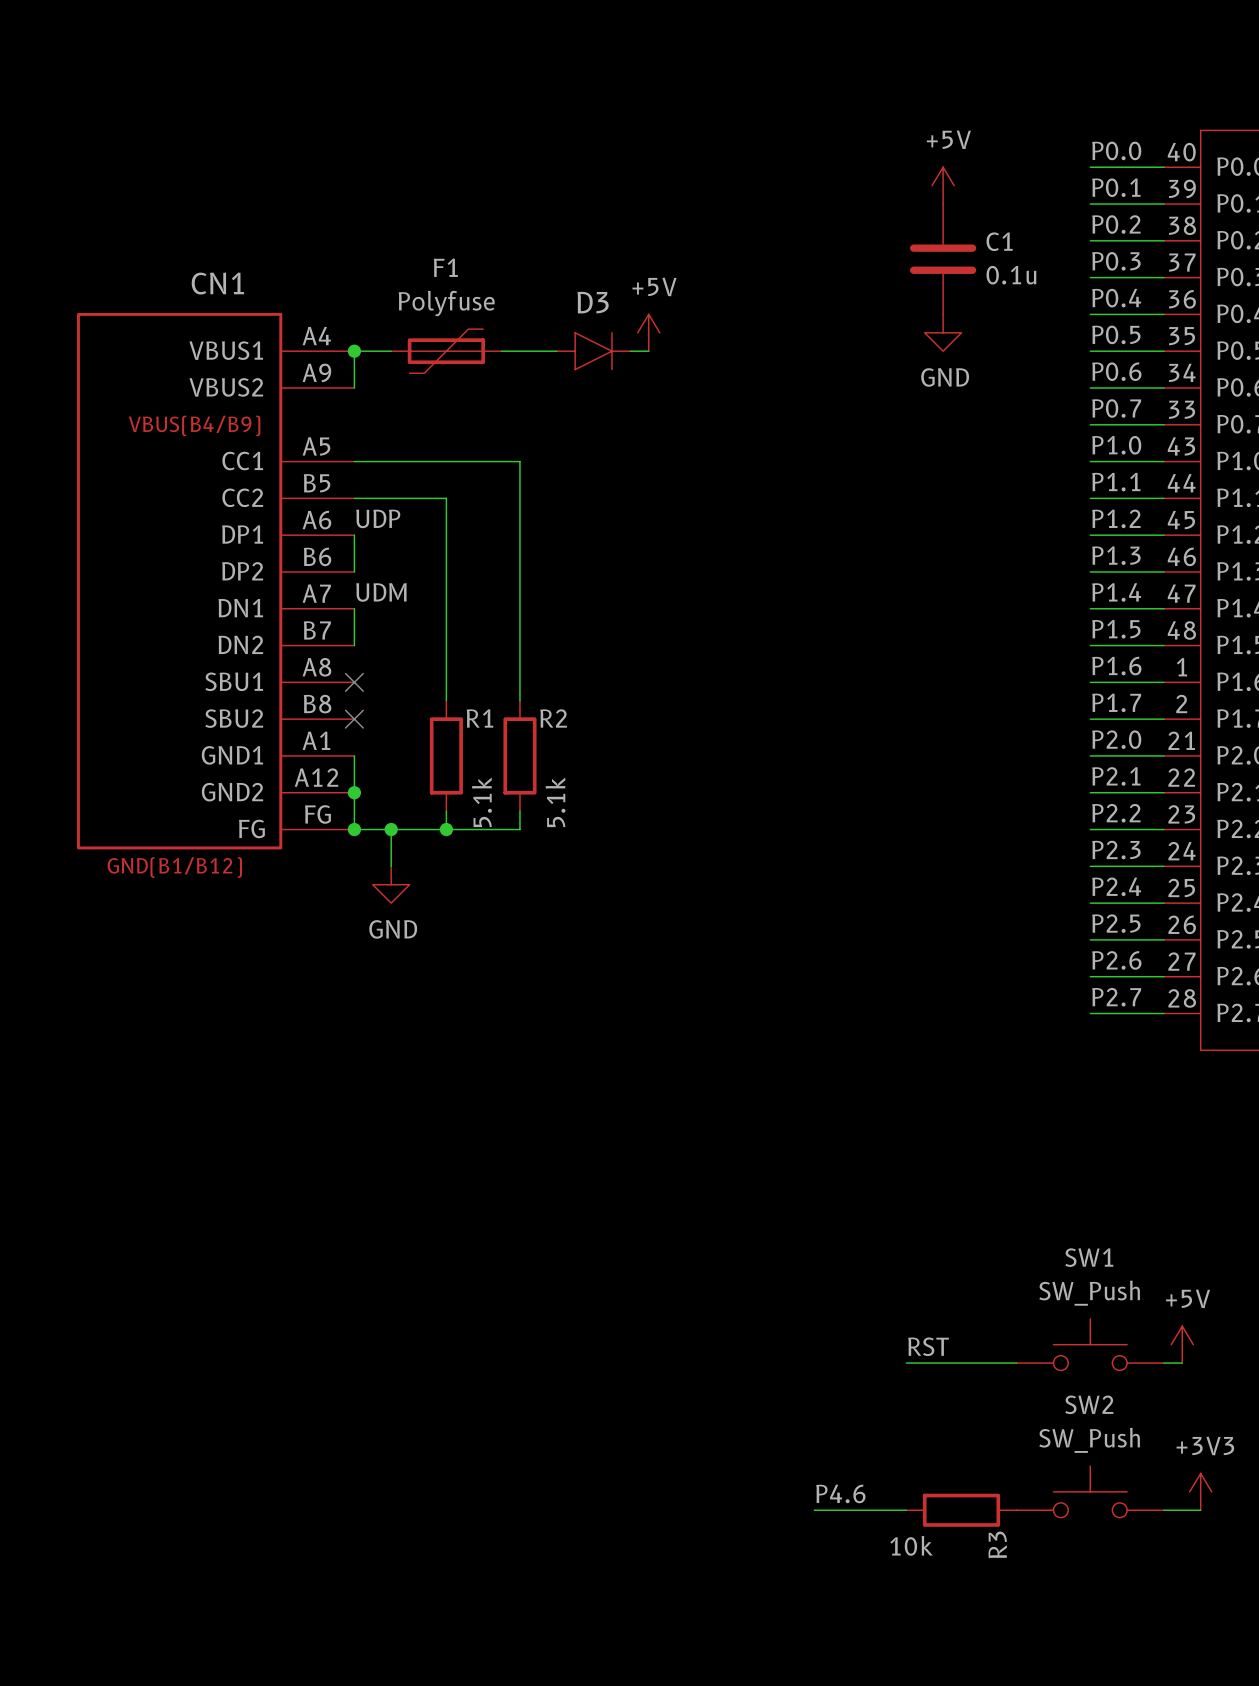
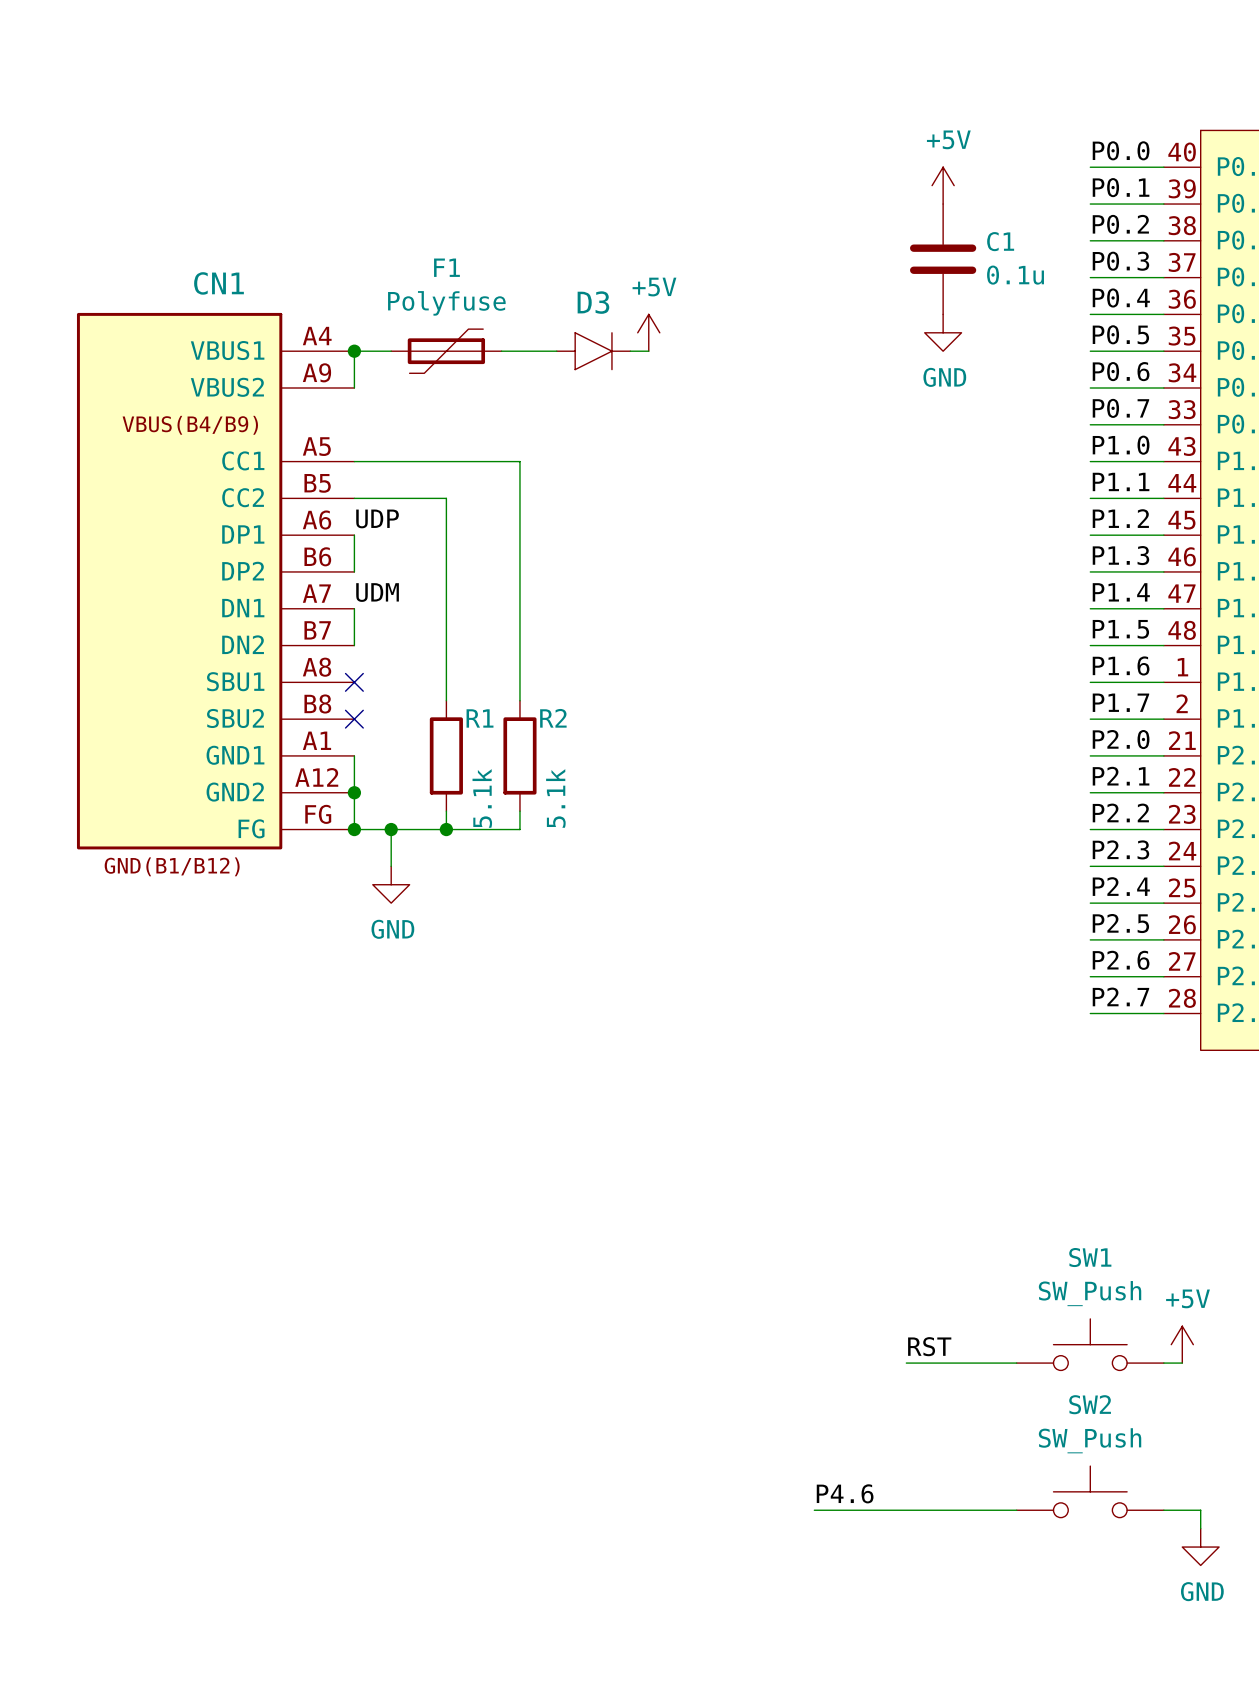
power symbol: +3V3 (1200, 1491) -> none
wire: none -> (906, 1510) (1016, 1510)
R3: 10k (961, 1510) -> none
wire: none -> (1200, 1510) (1200, 1528)
power symbol: none -> GND (1200, 1547)

